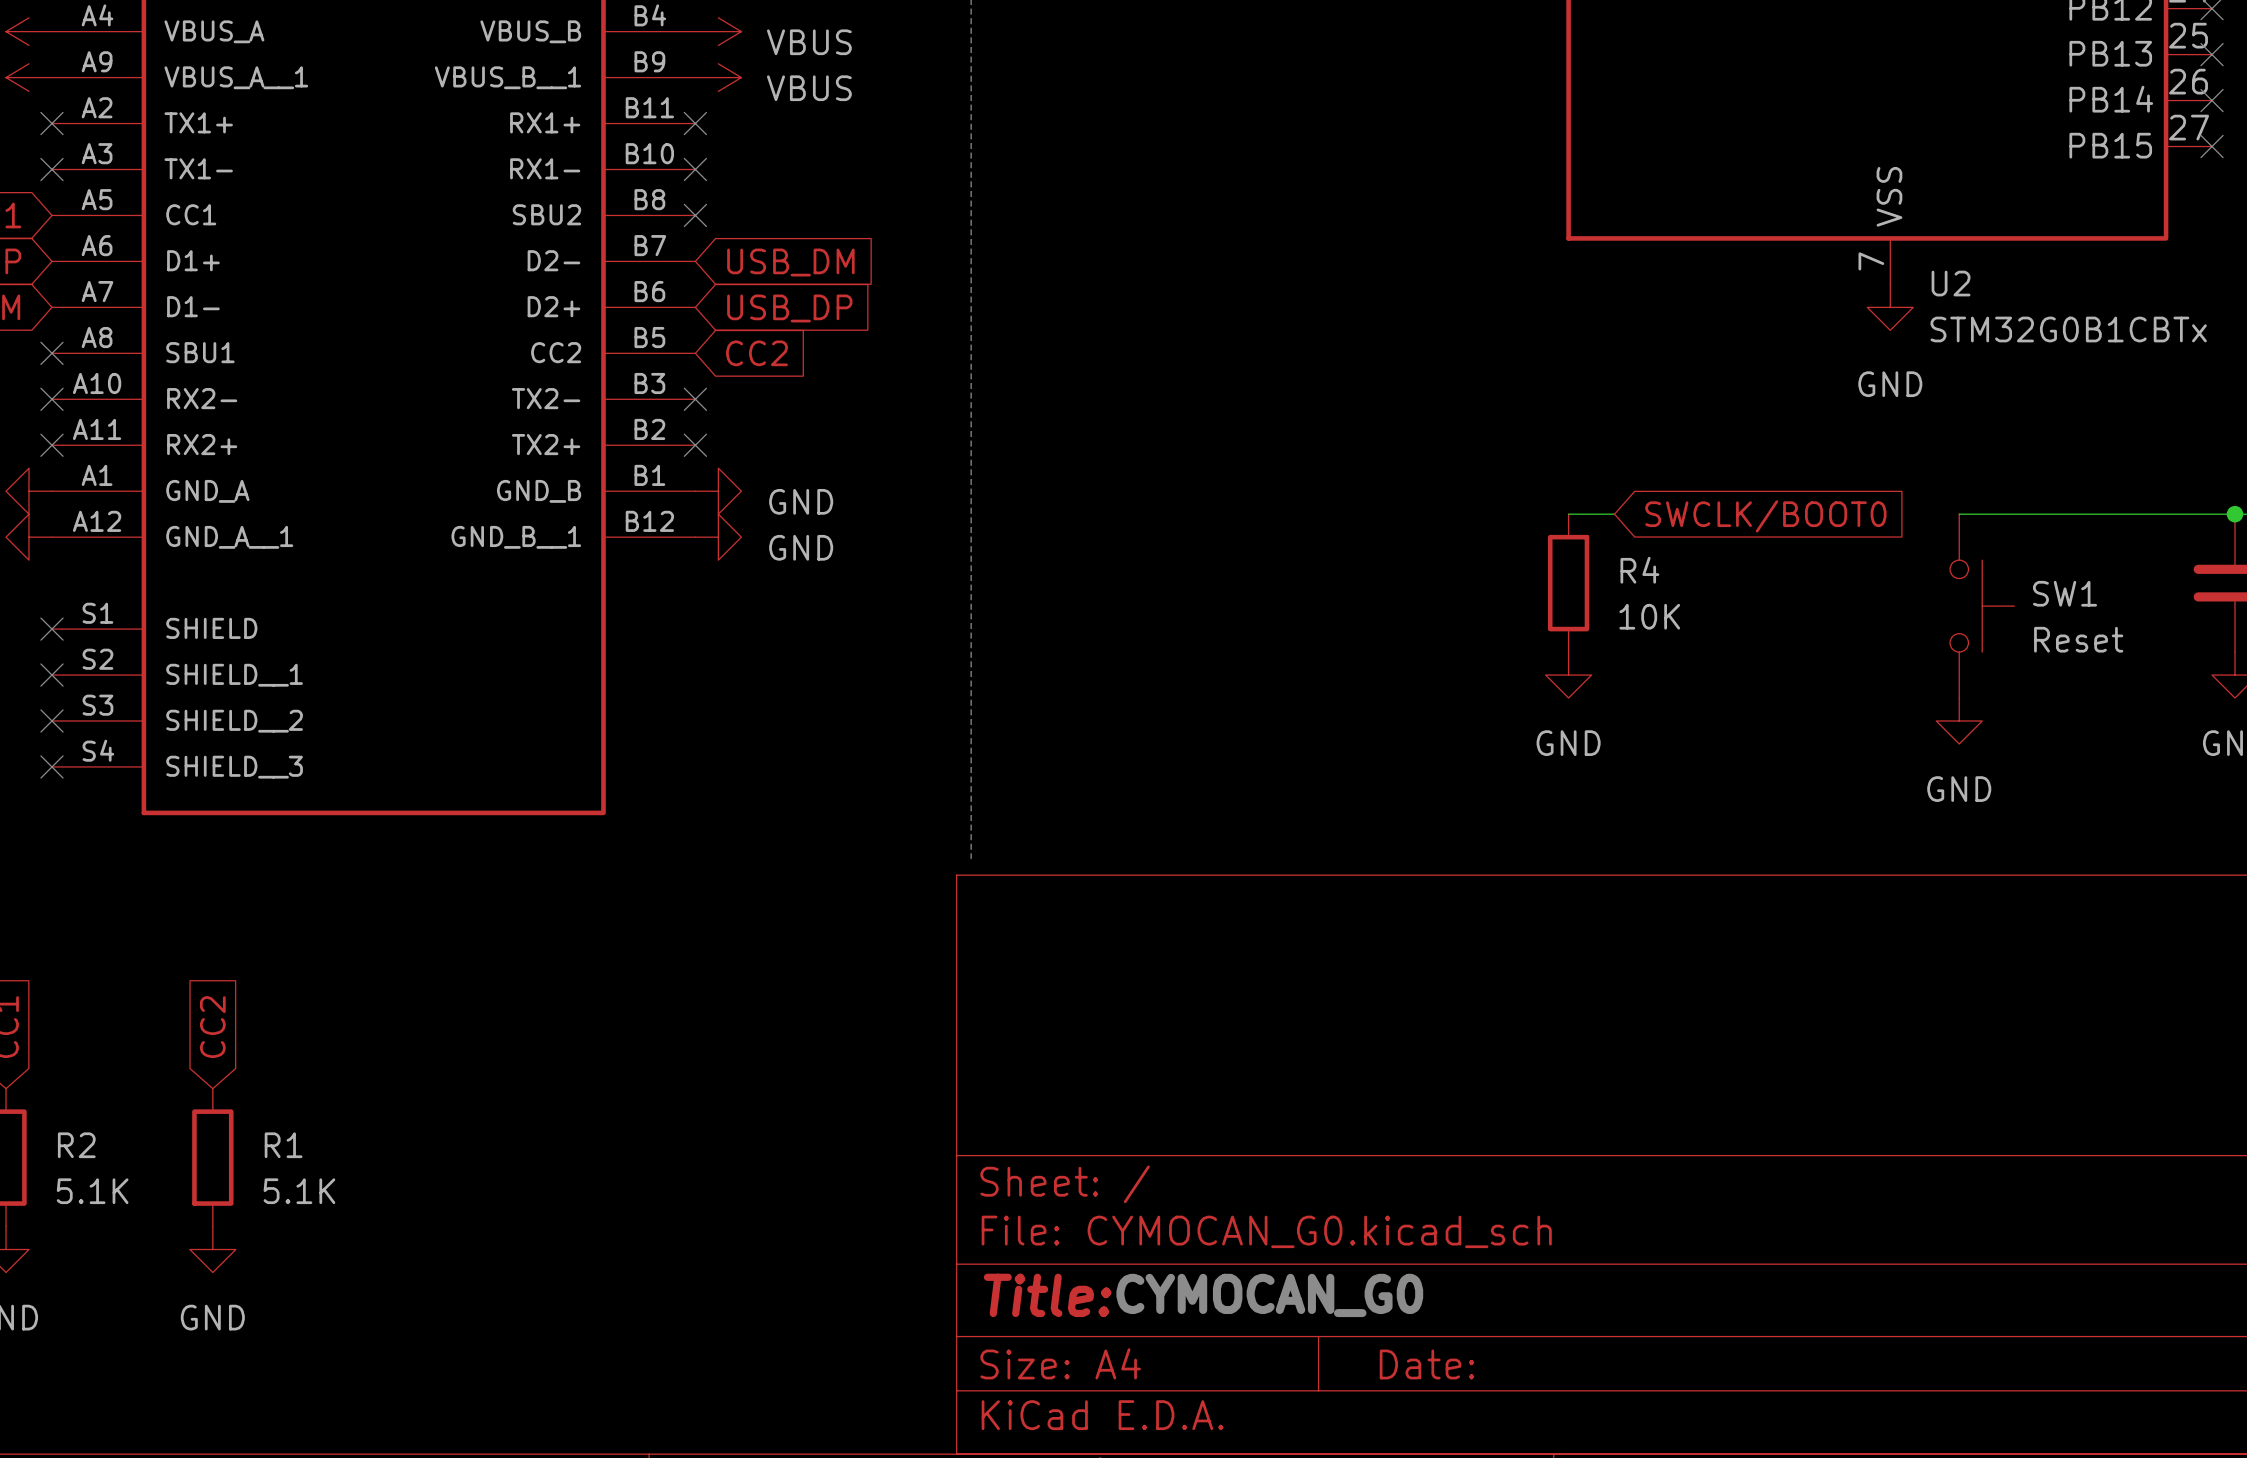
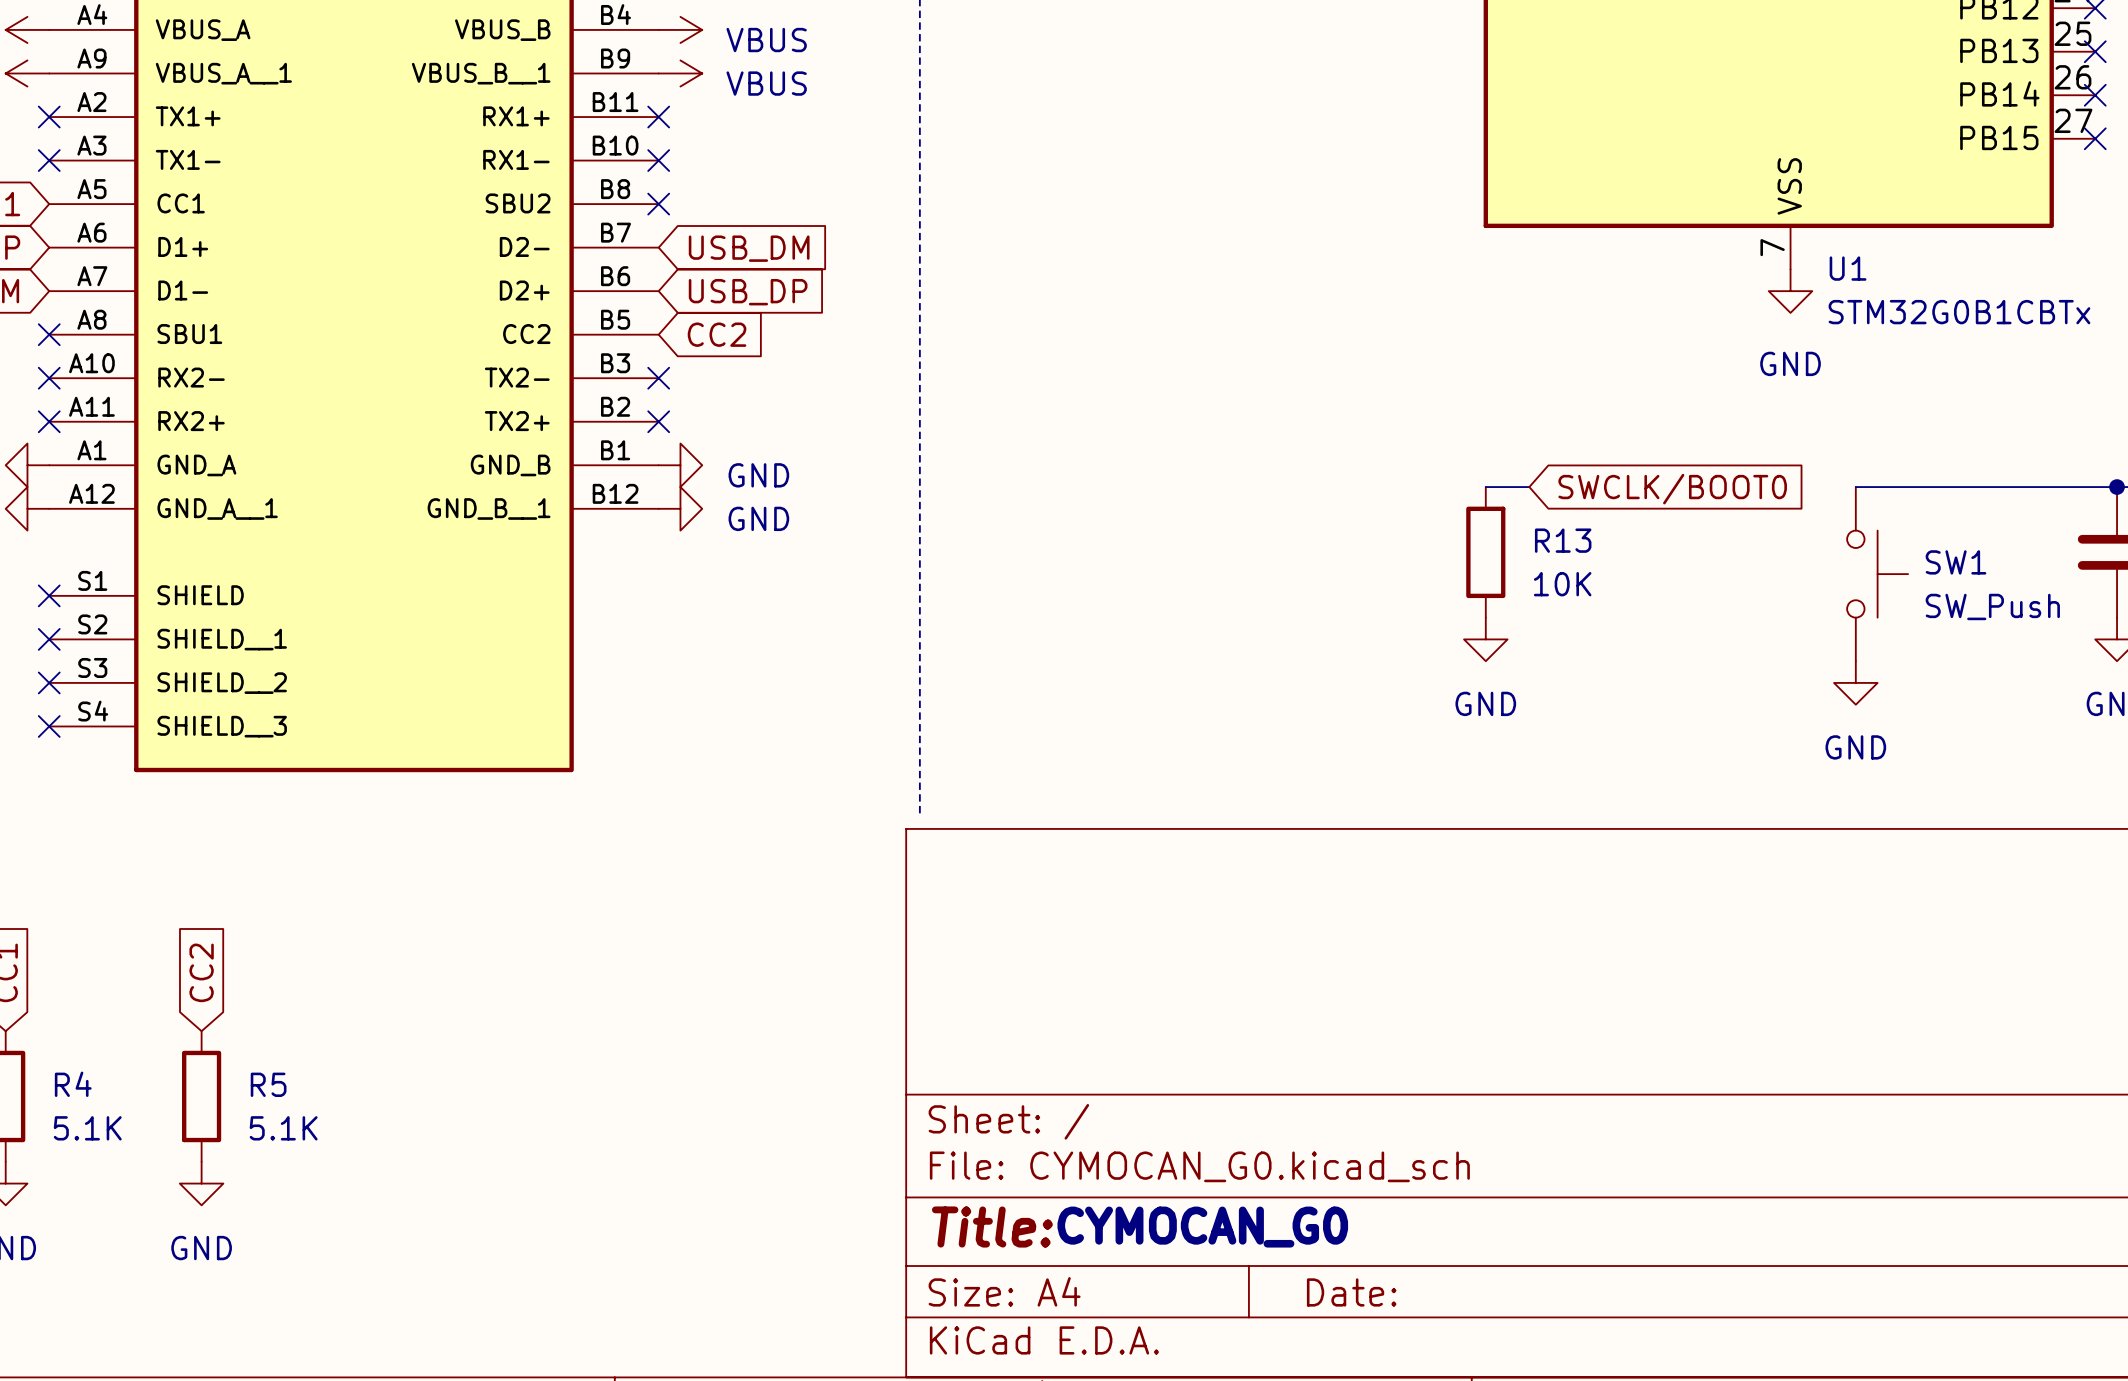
U2 name: U2 (1951, 283) -> U1 (1848, 268)
R4 name: R4 (1639, 570) -> R13 (1563, 540)
SW1 value: Reset (2078, 639) -> SW_Push (1992, 606)
R2 name: R2 (76, 1145) -> R4 (73, 1084)
R1 name: R1 (283, 1145) -> R5 (268, 1084)

